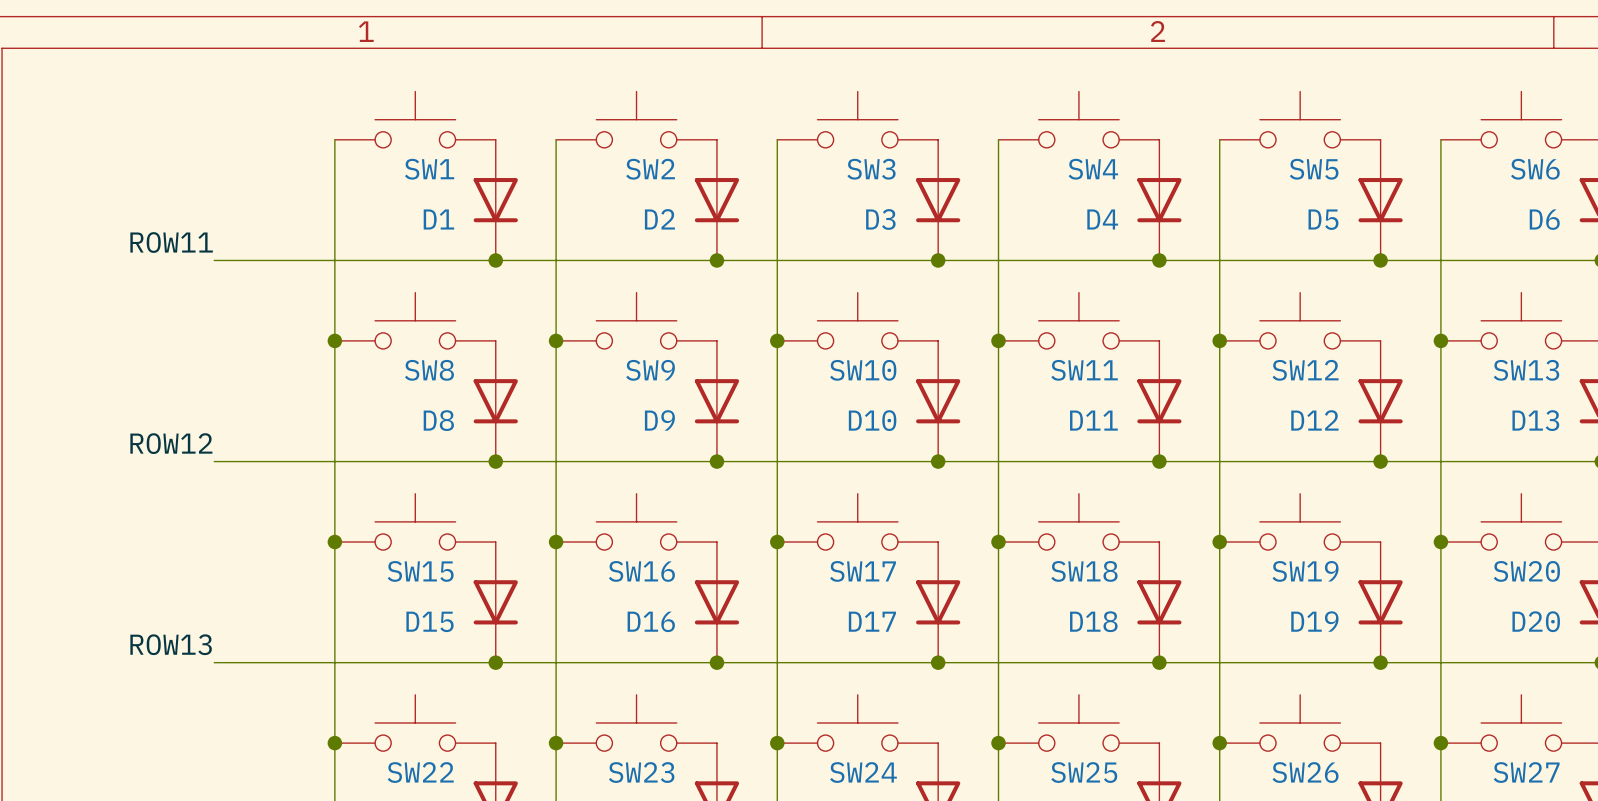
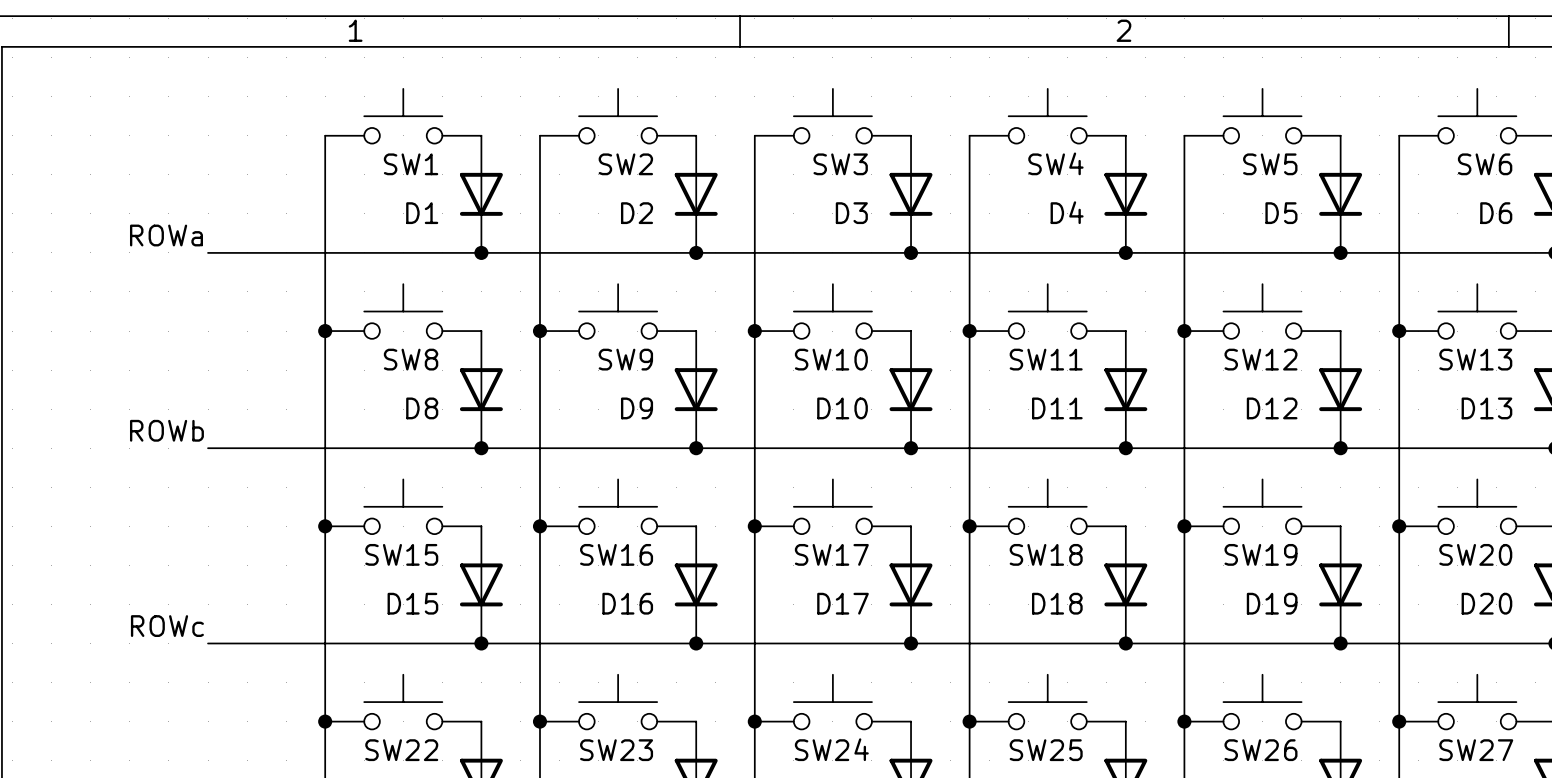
label: ROW11 (171, 242) -> ROWa (166, 235)
label: ROW12 (171, 443) -> ROWb (166, 430)
label: ROW13 (171, 644) -> ROWc (167, 626)

